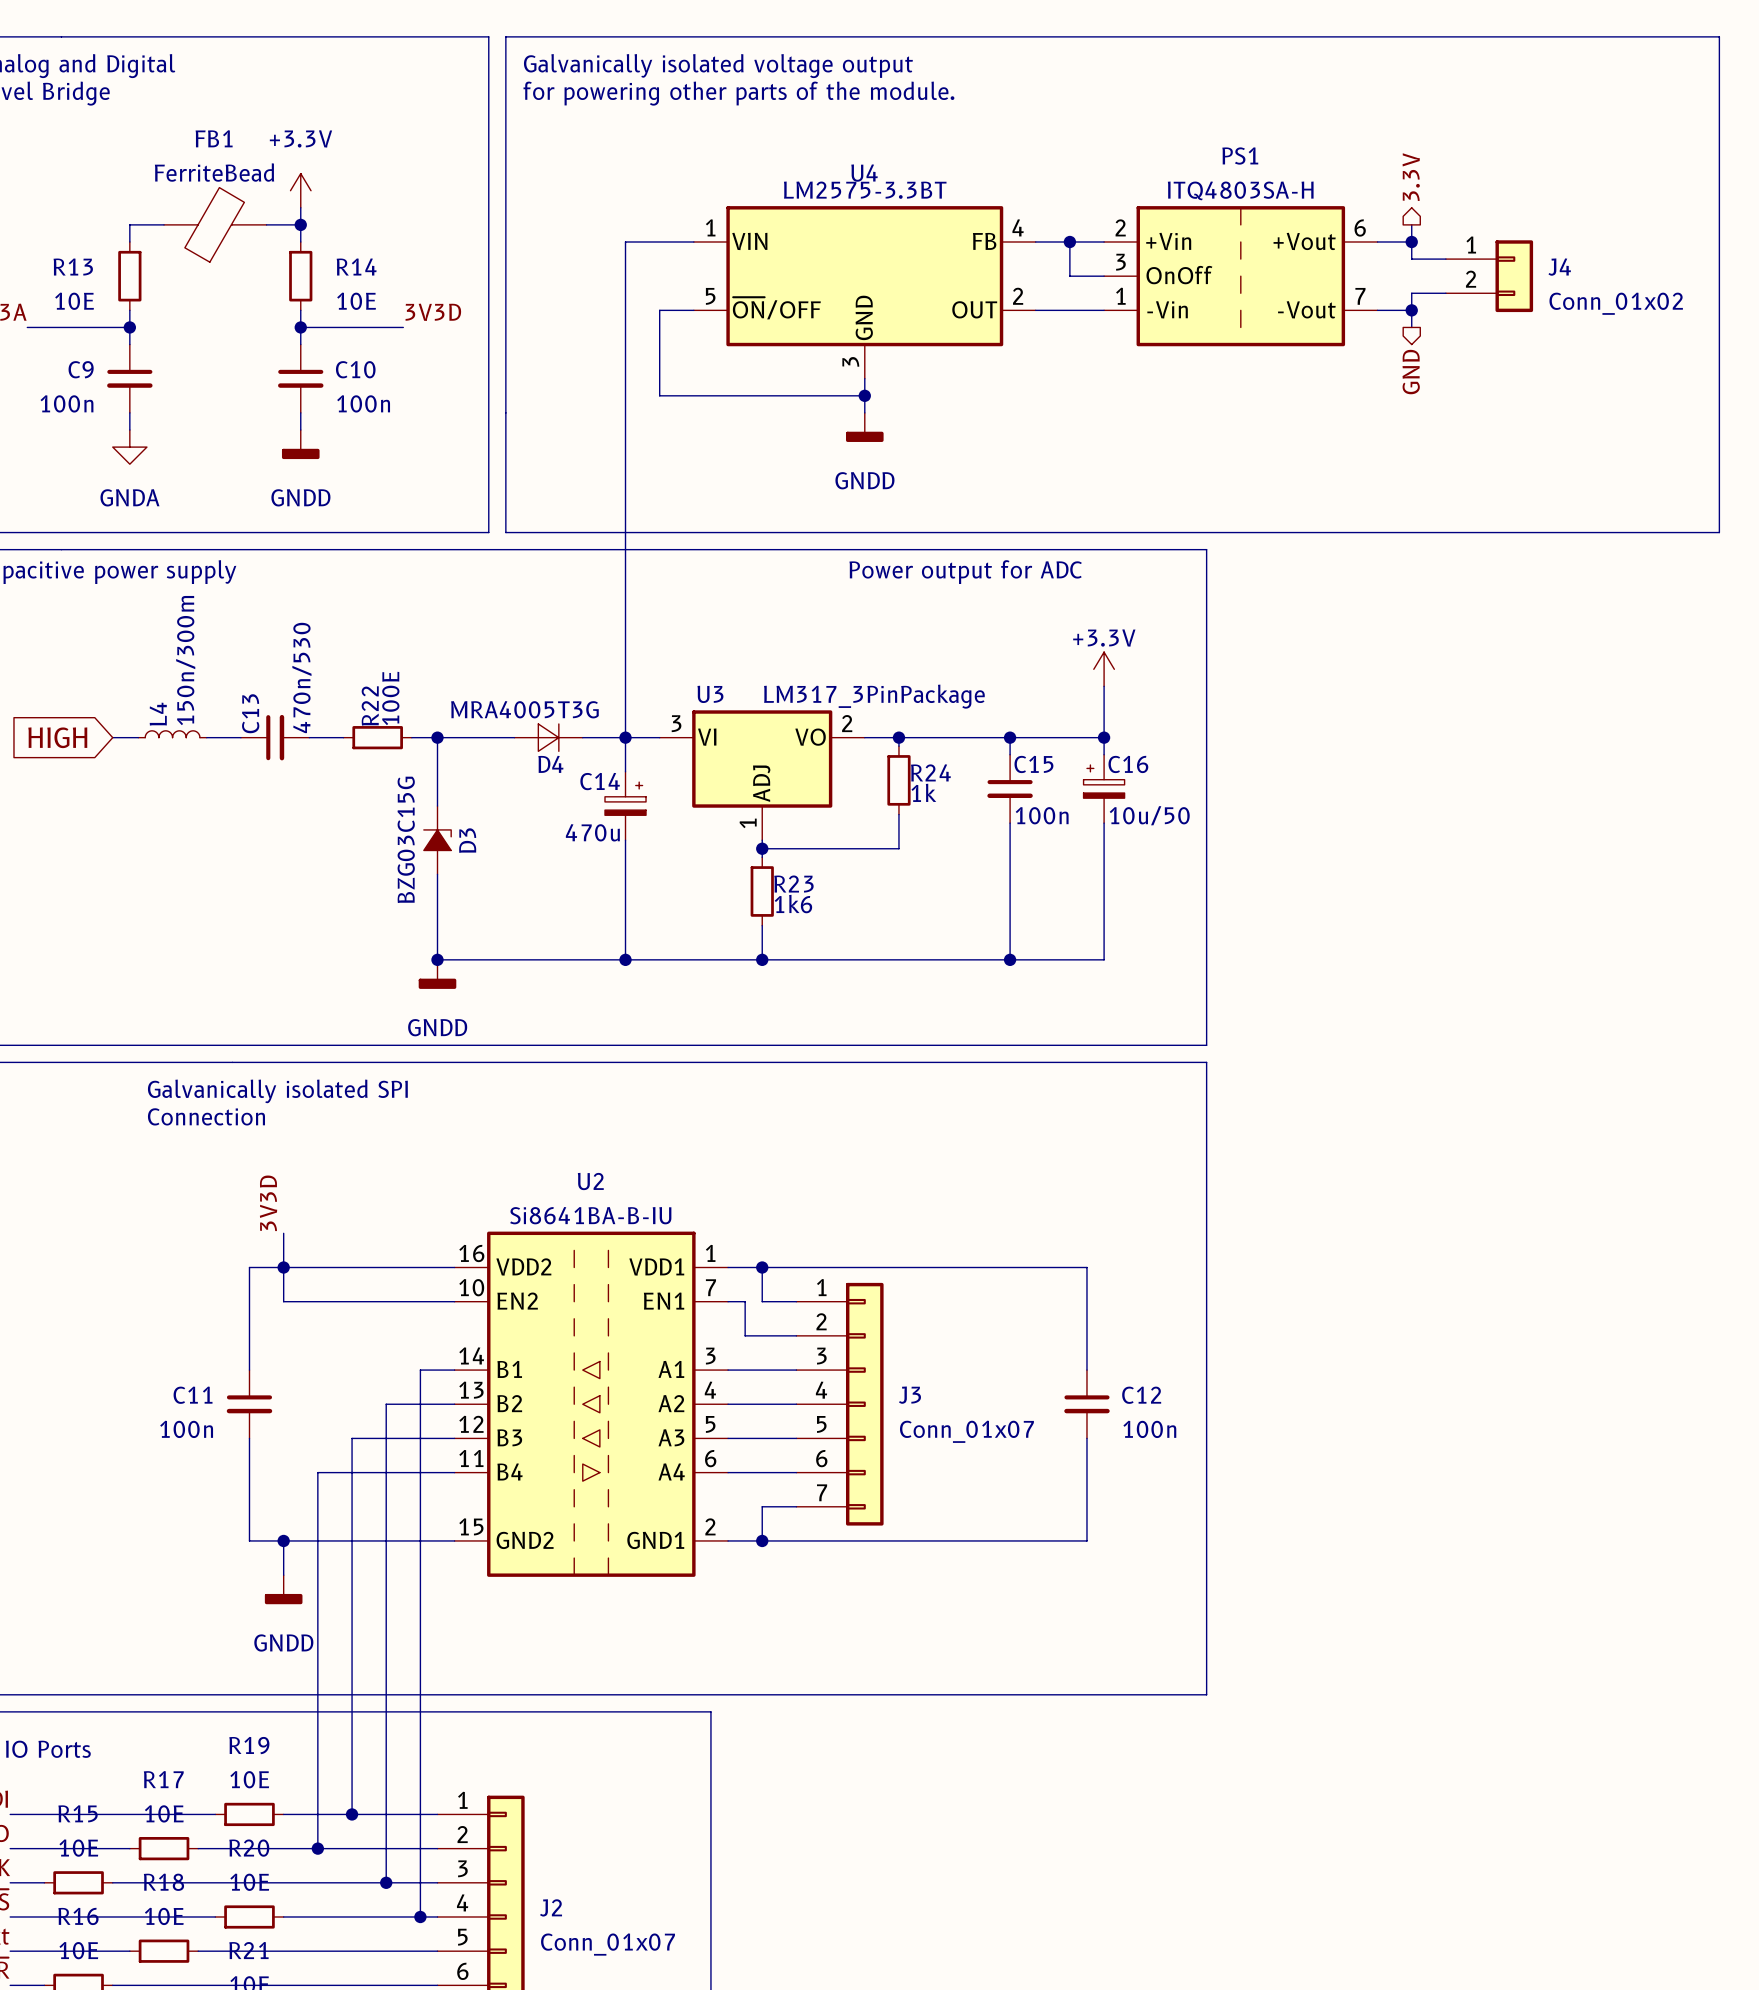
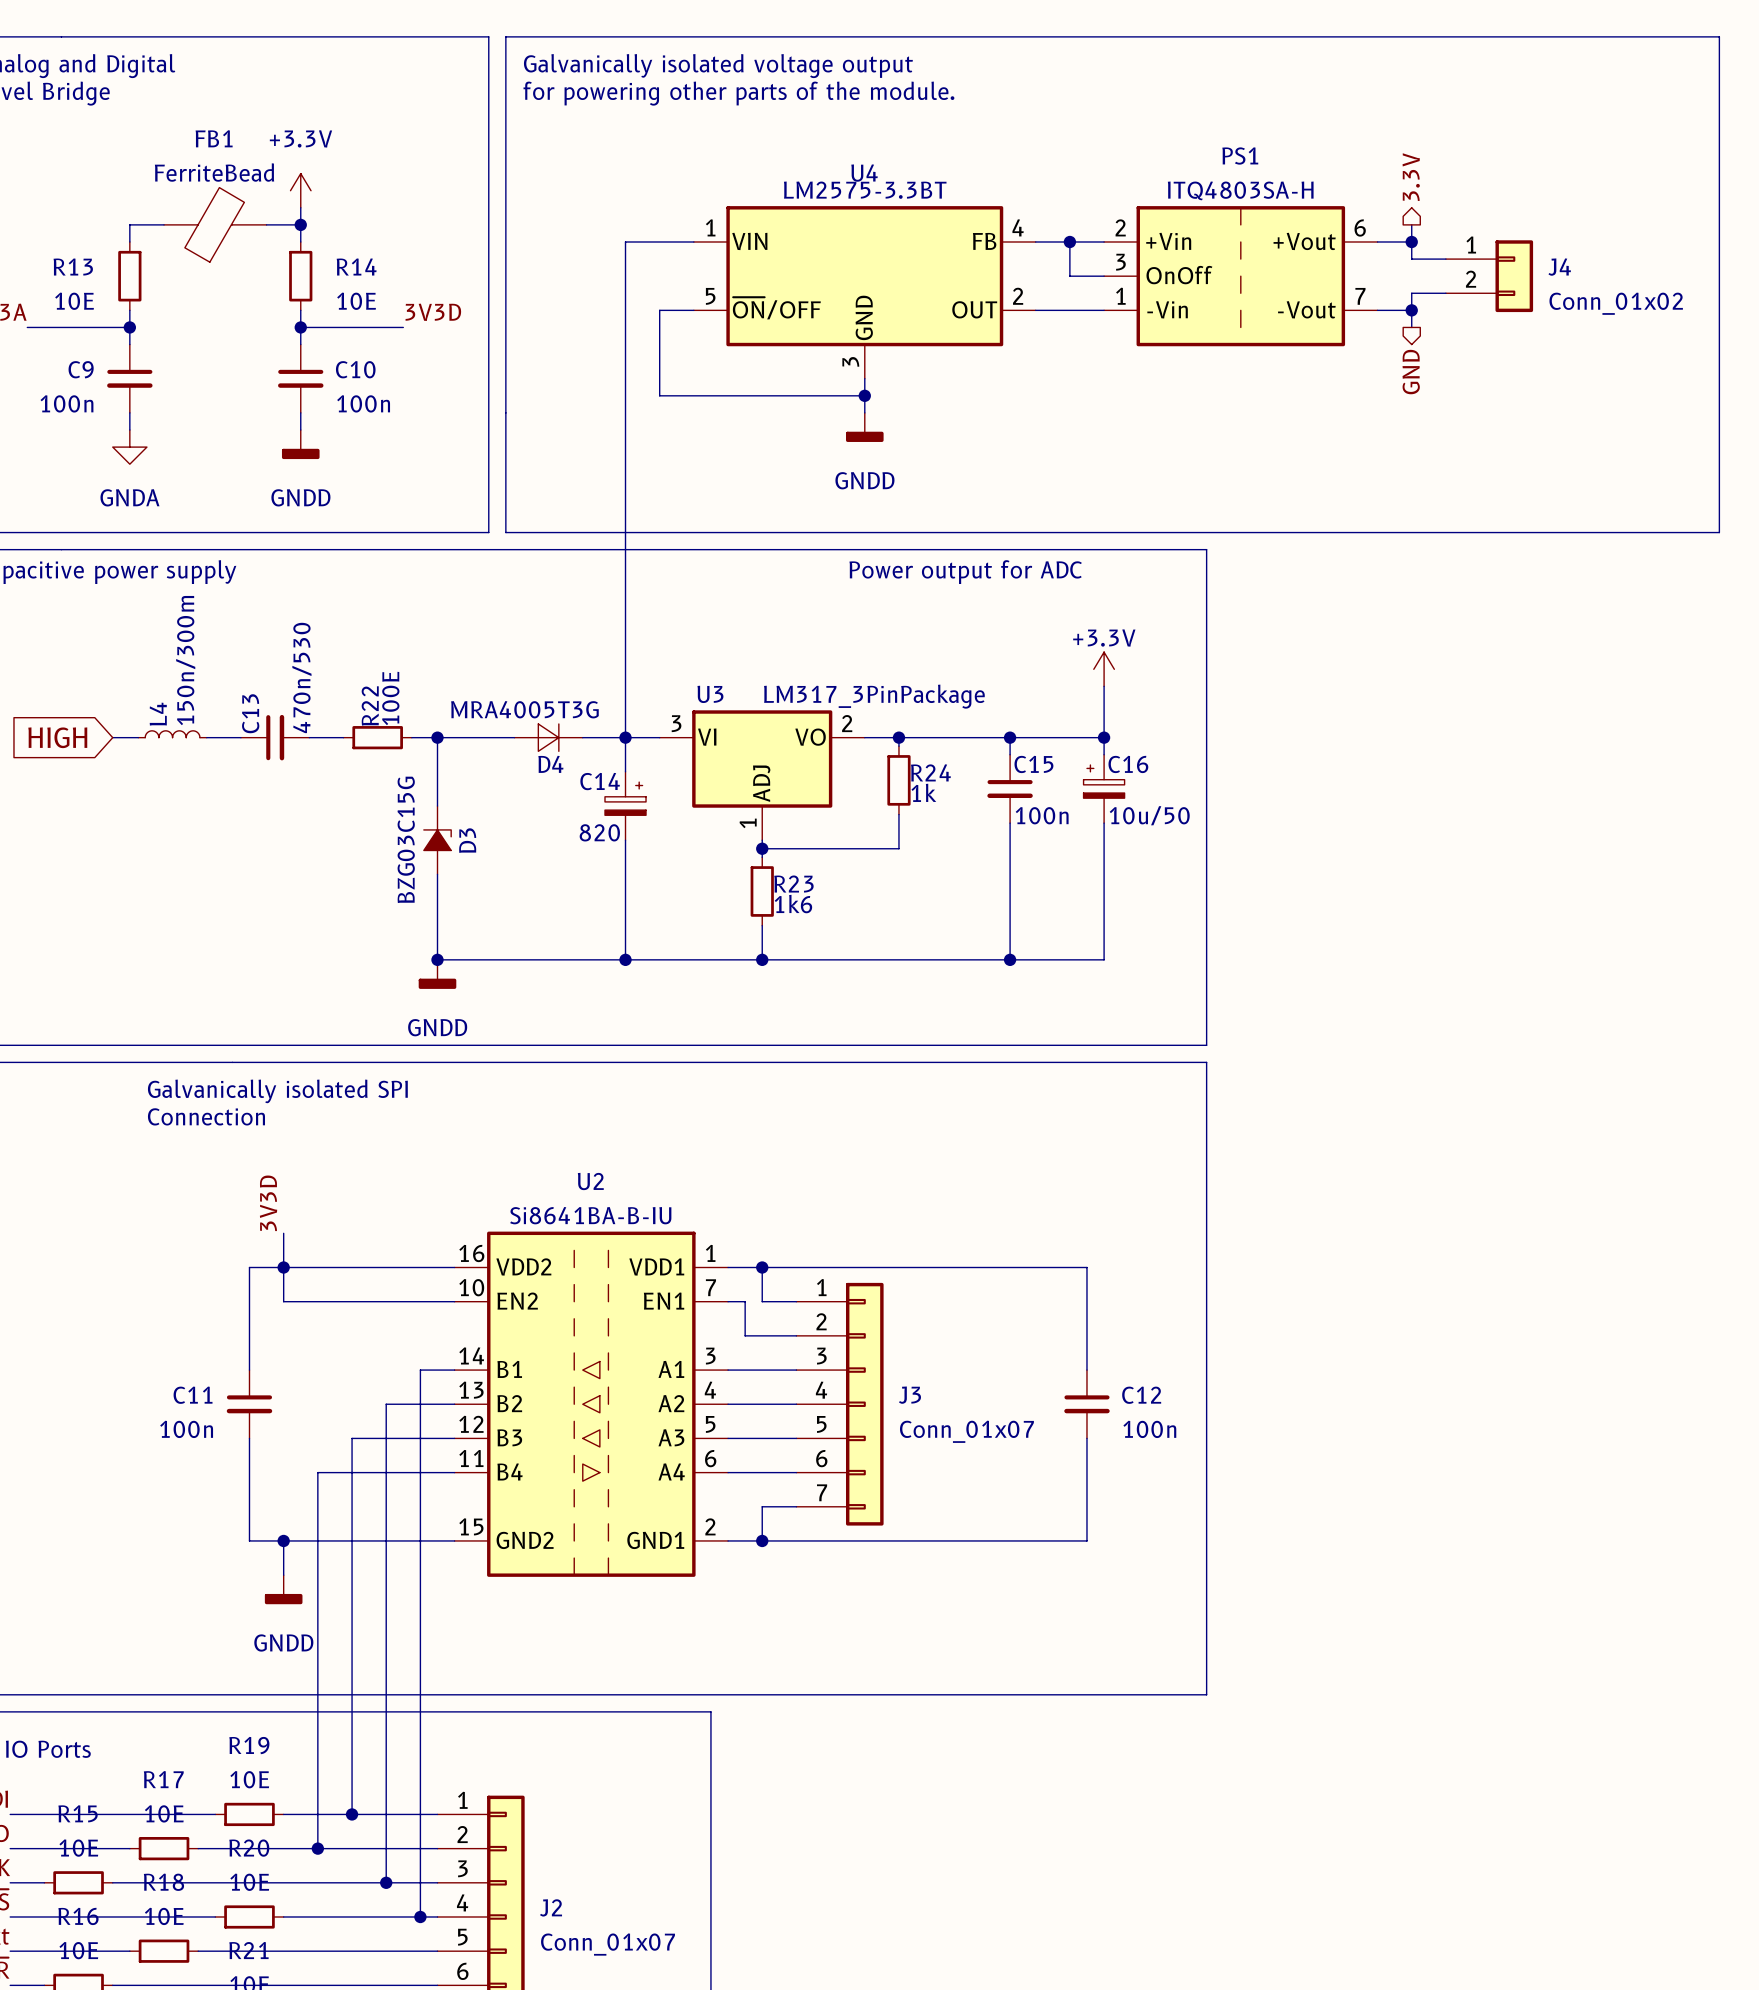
C14 value: 470u (592, 832) -> 820 (599, 832)

